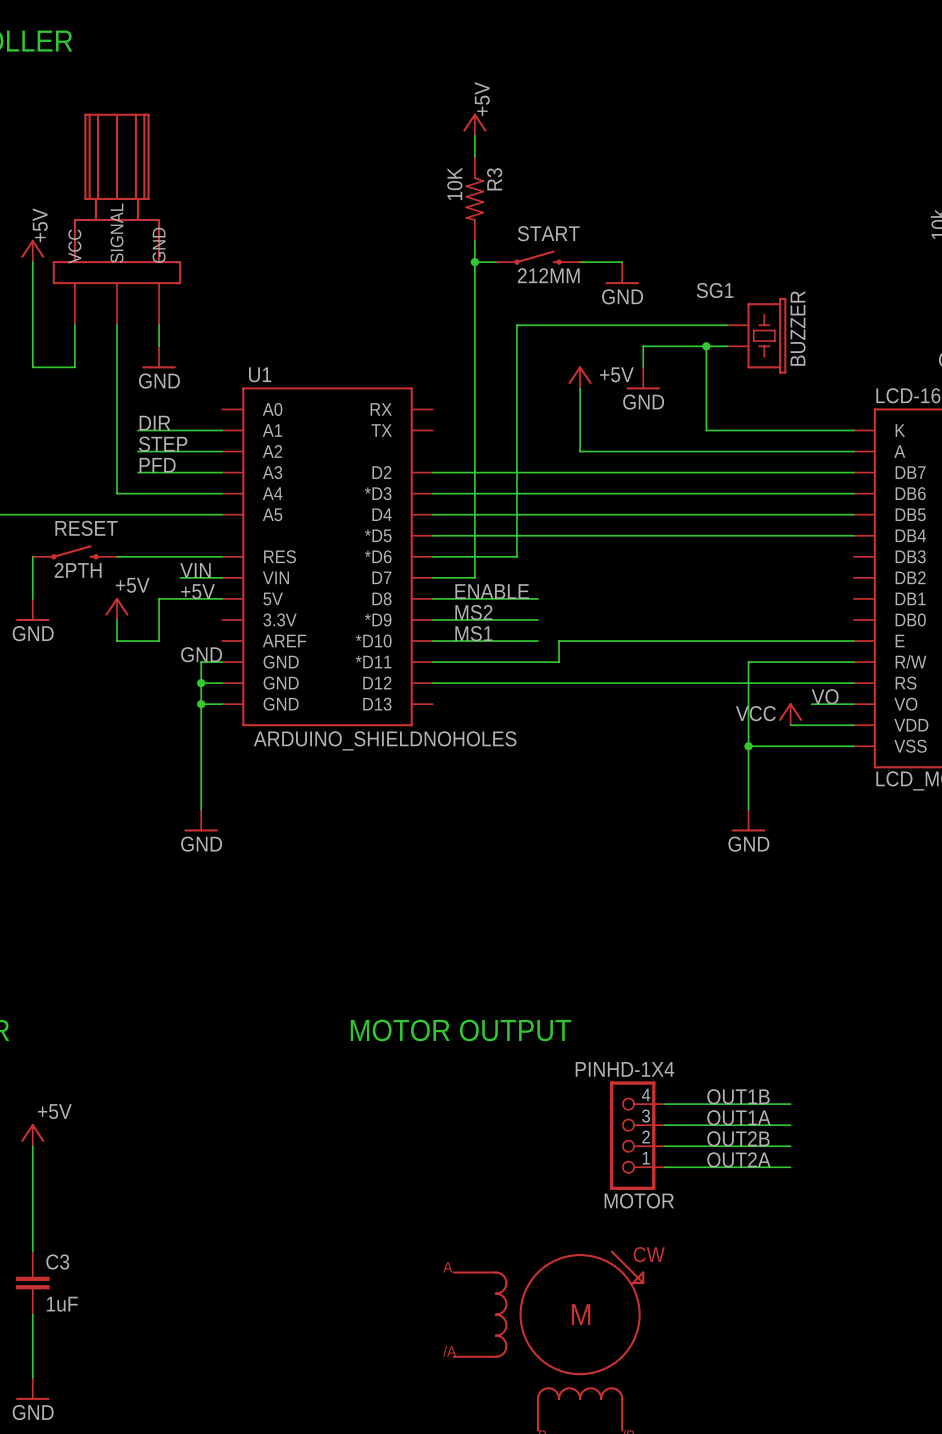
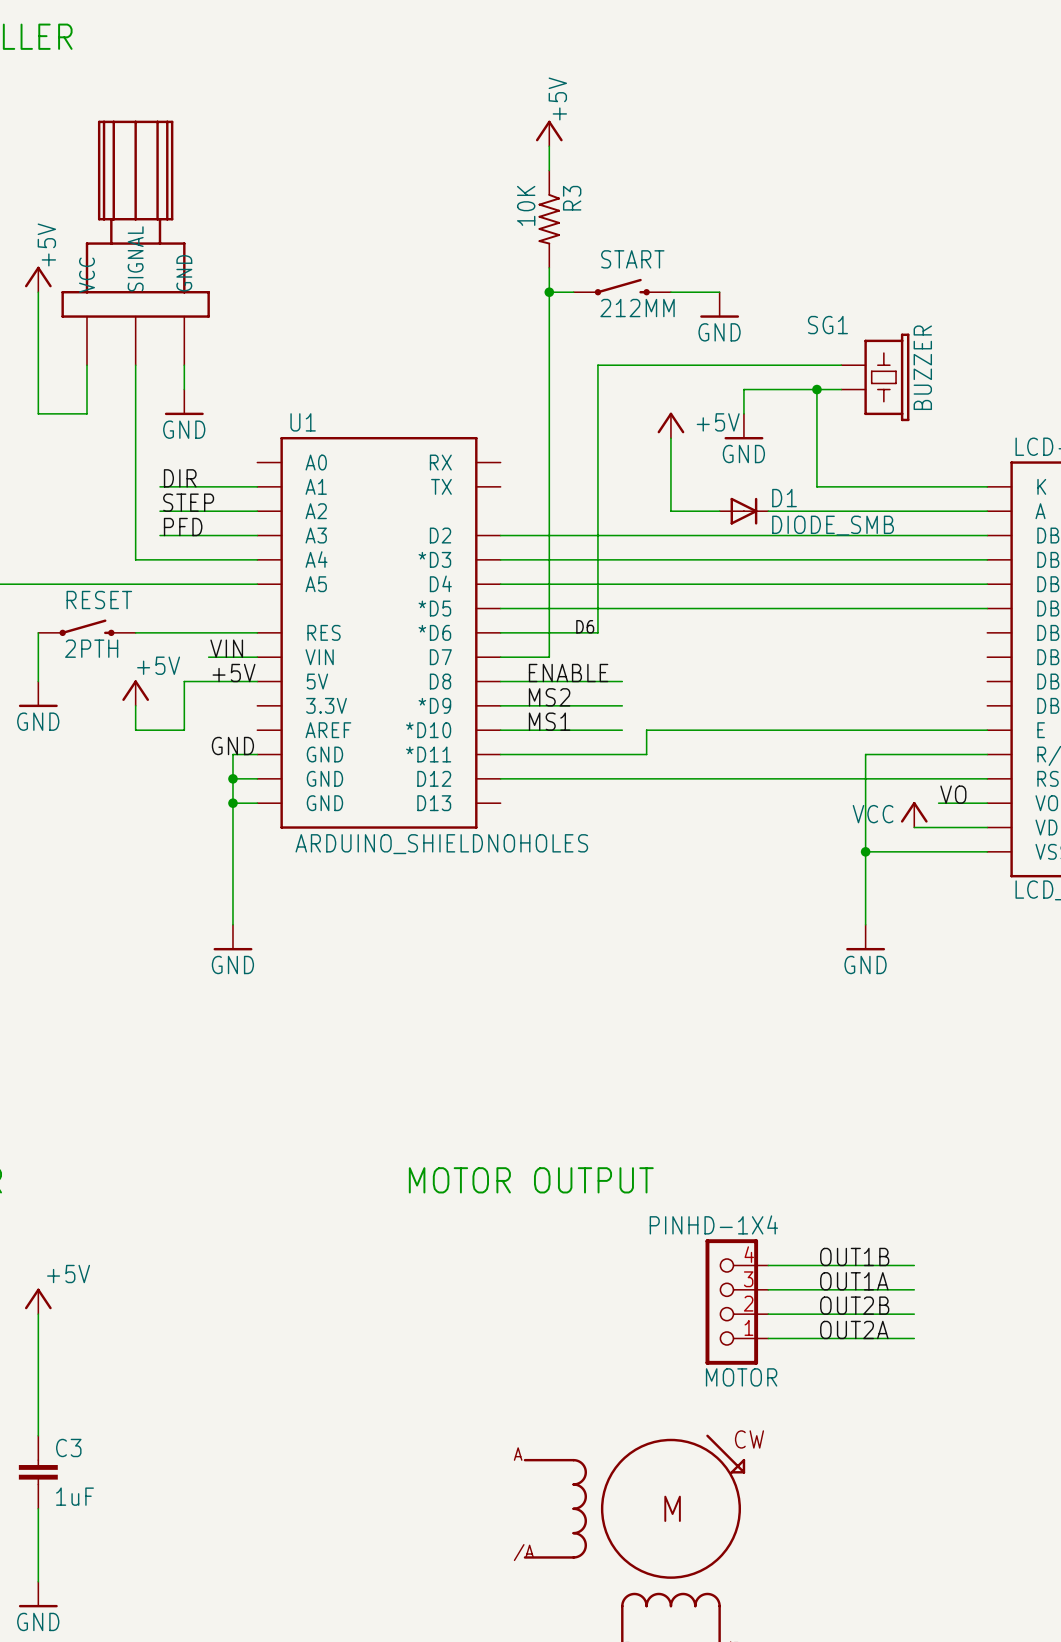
D1: none -> DIODE_SMB (743, 511)
label: none -> D6 (585, 626)

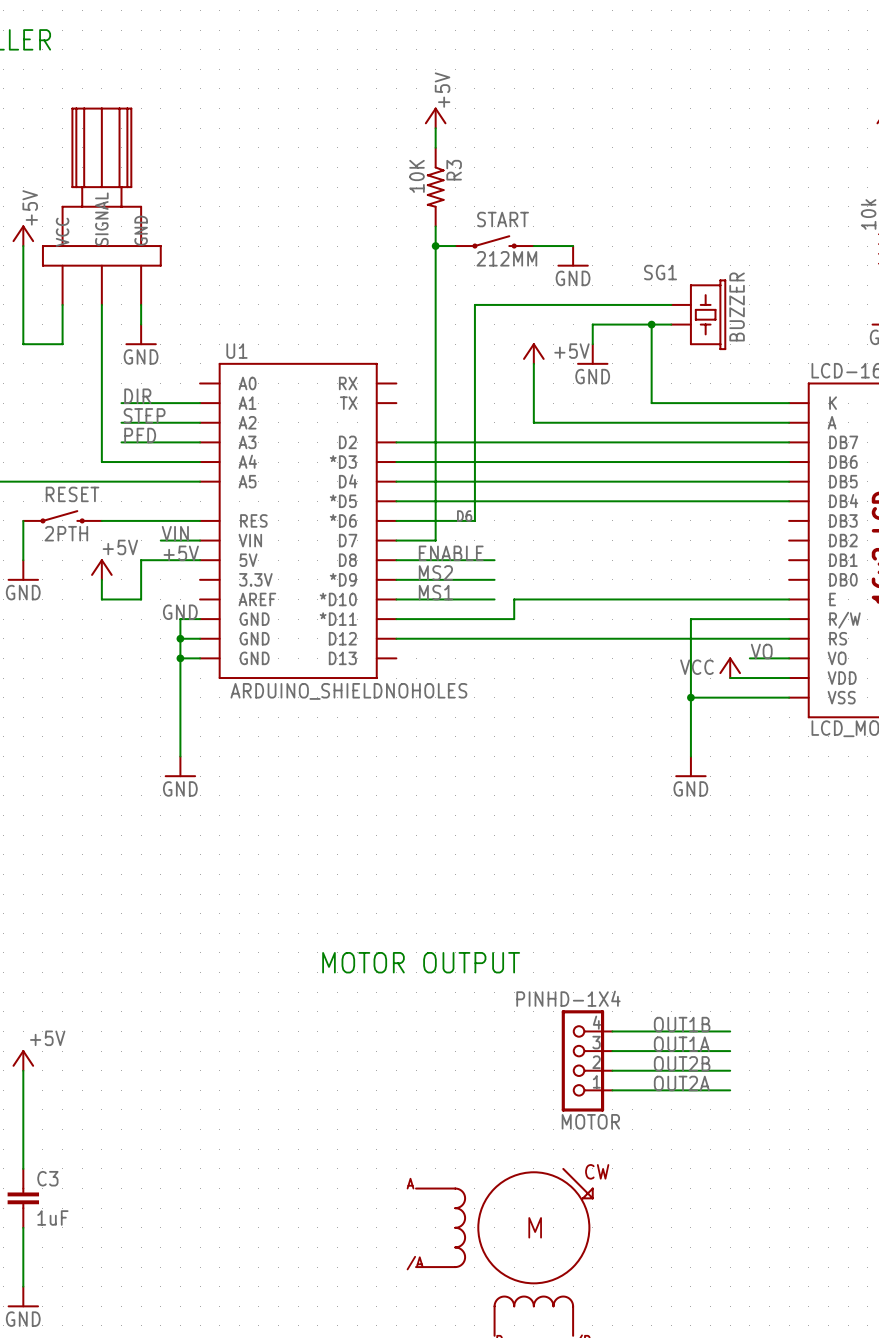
D1: DIODE_SMB (743, 511) -> none

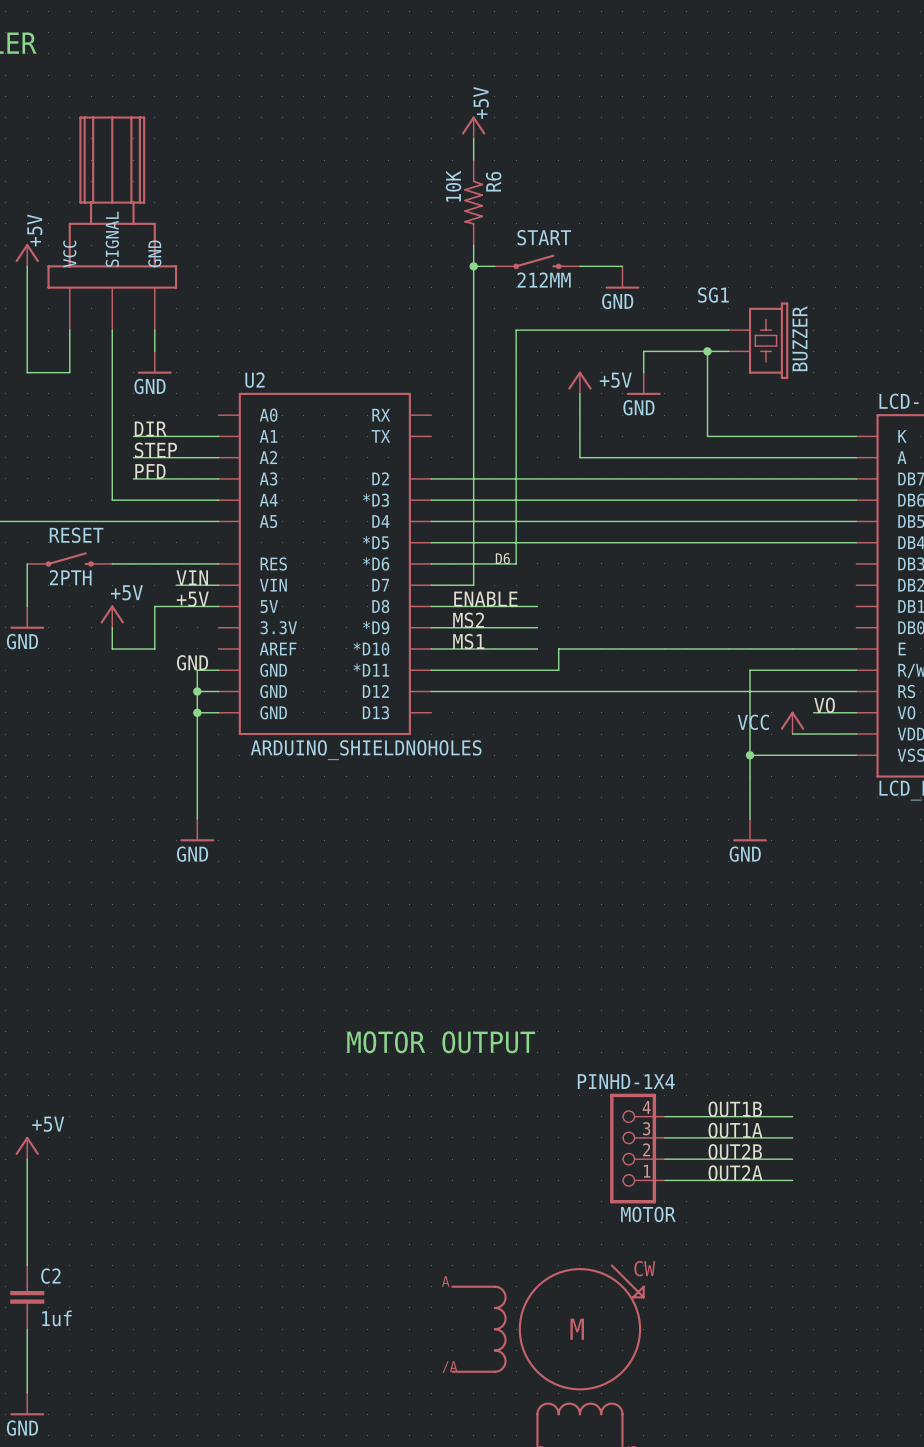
R3 name: R3 (454, 170) -> R6 (493, 181)
U1 name: U1 (236, 351) -> U2 (255, 380)
C3 name: C3 (47, 1178) -> C2 (50, 1276)
C3 value: 1uF (52, 1217) -> 1uf (56, 1318)

